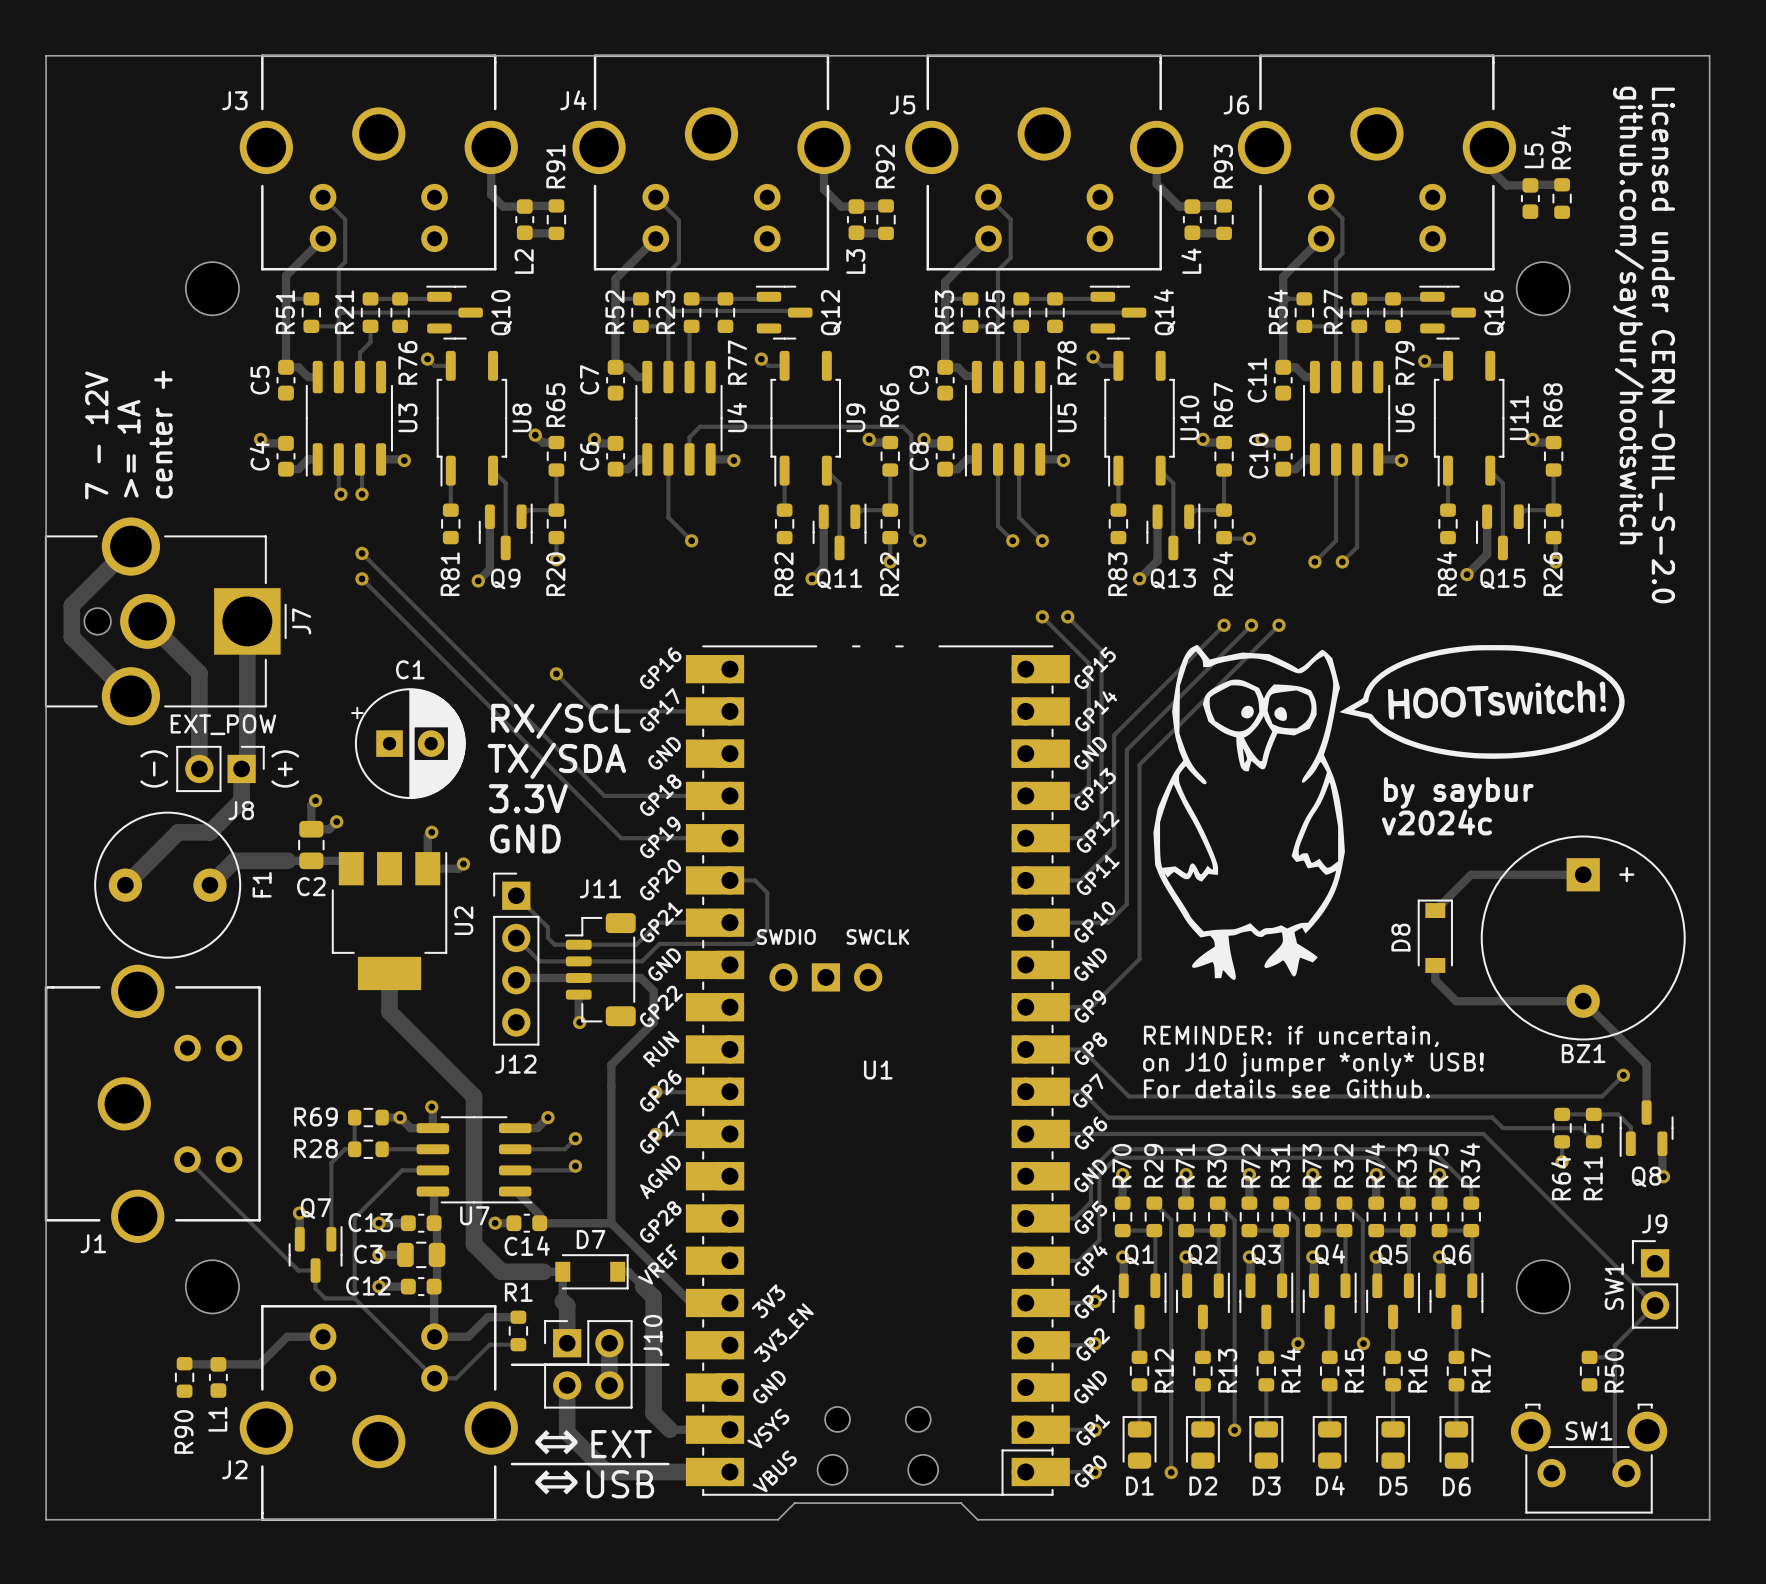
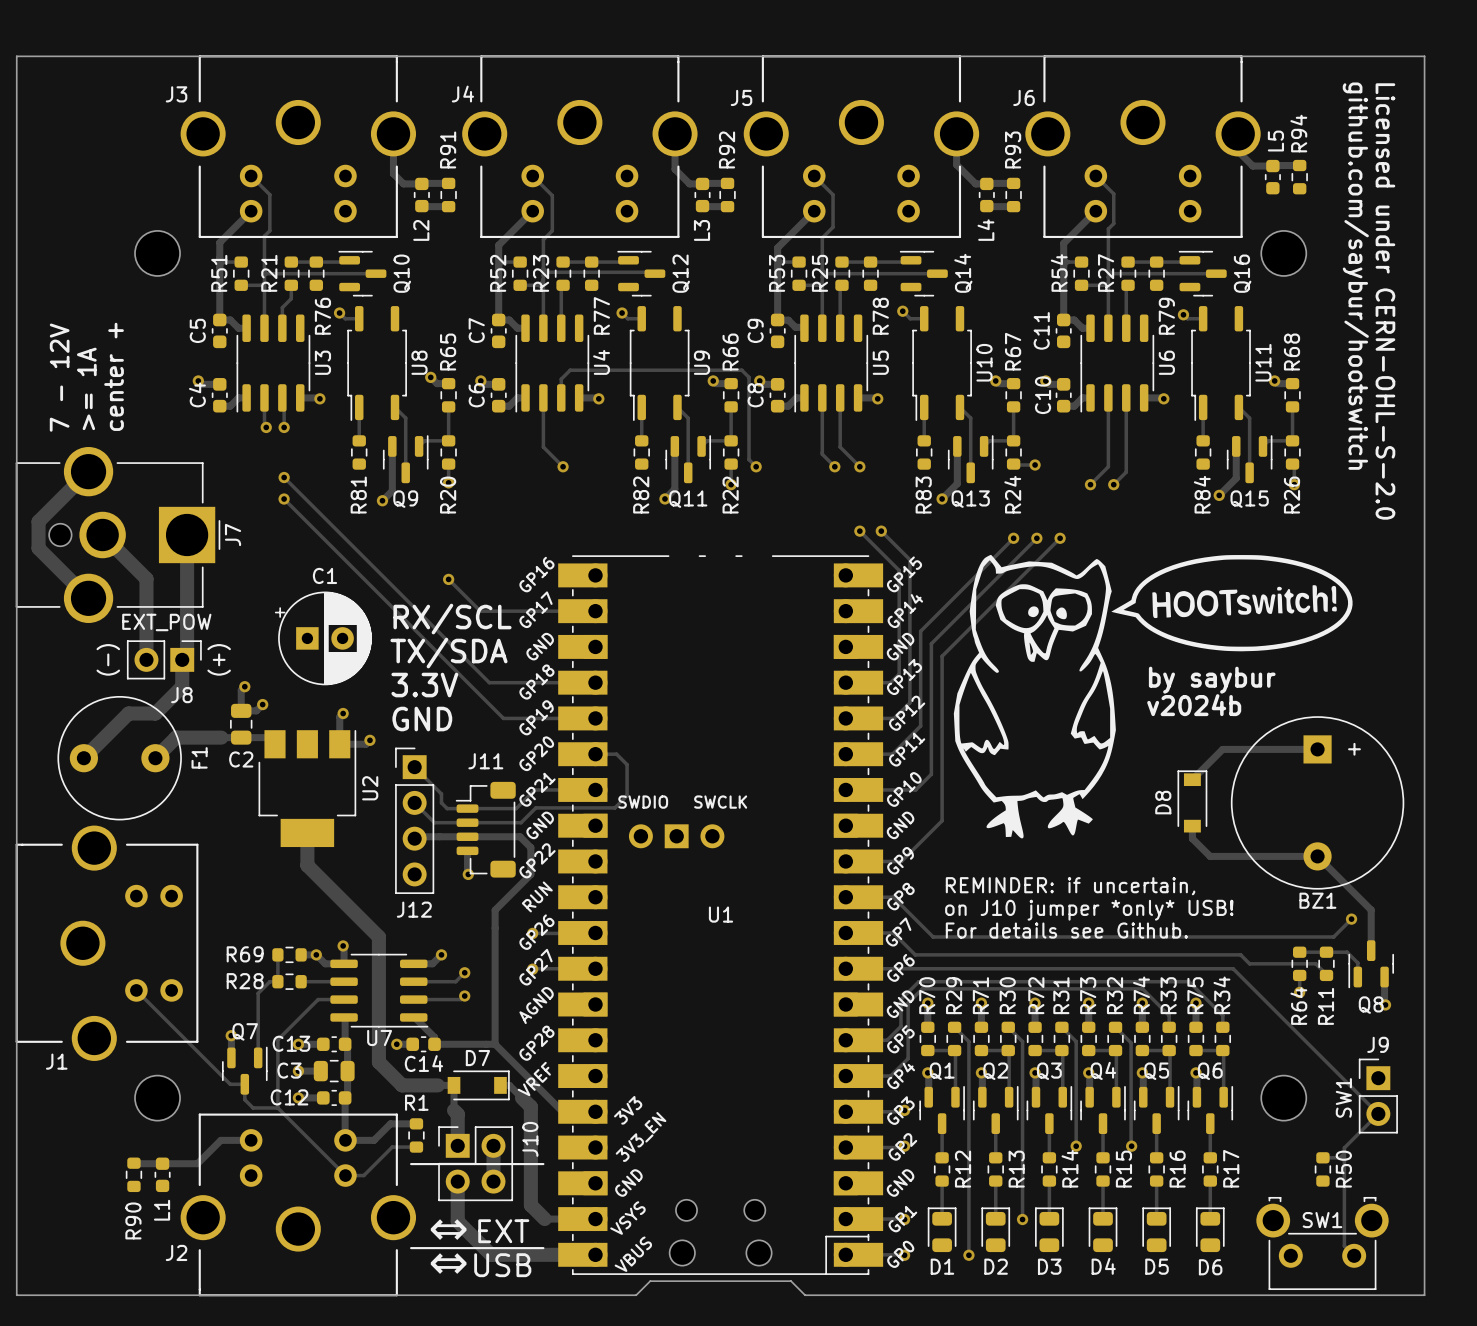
text: v2024c (1436, 822) -> v2024b (1194, 705)

